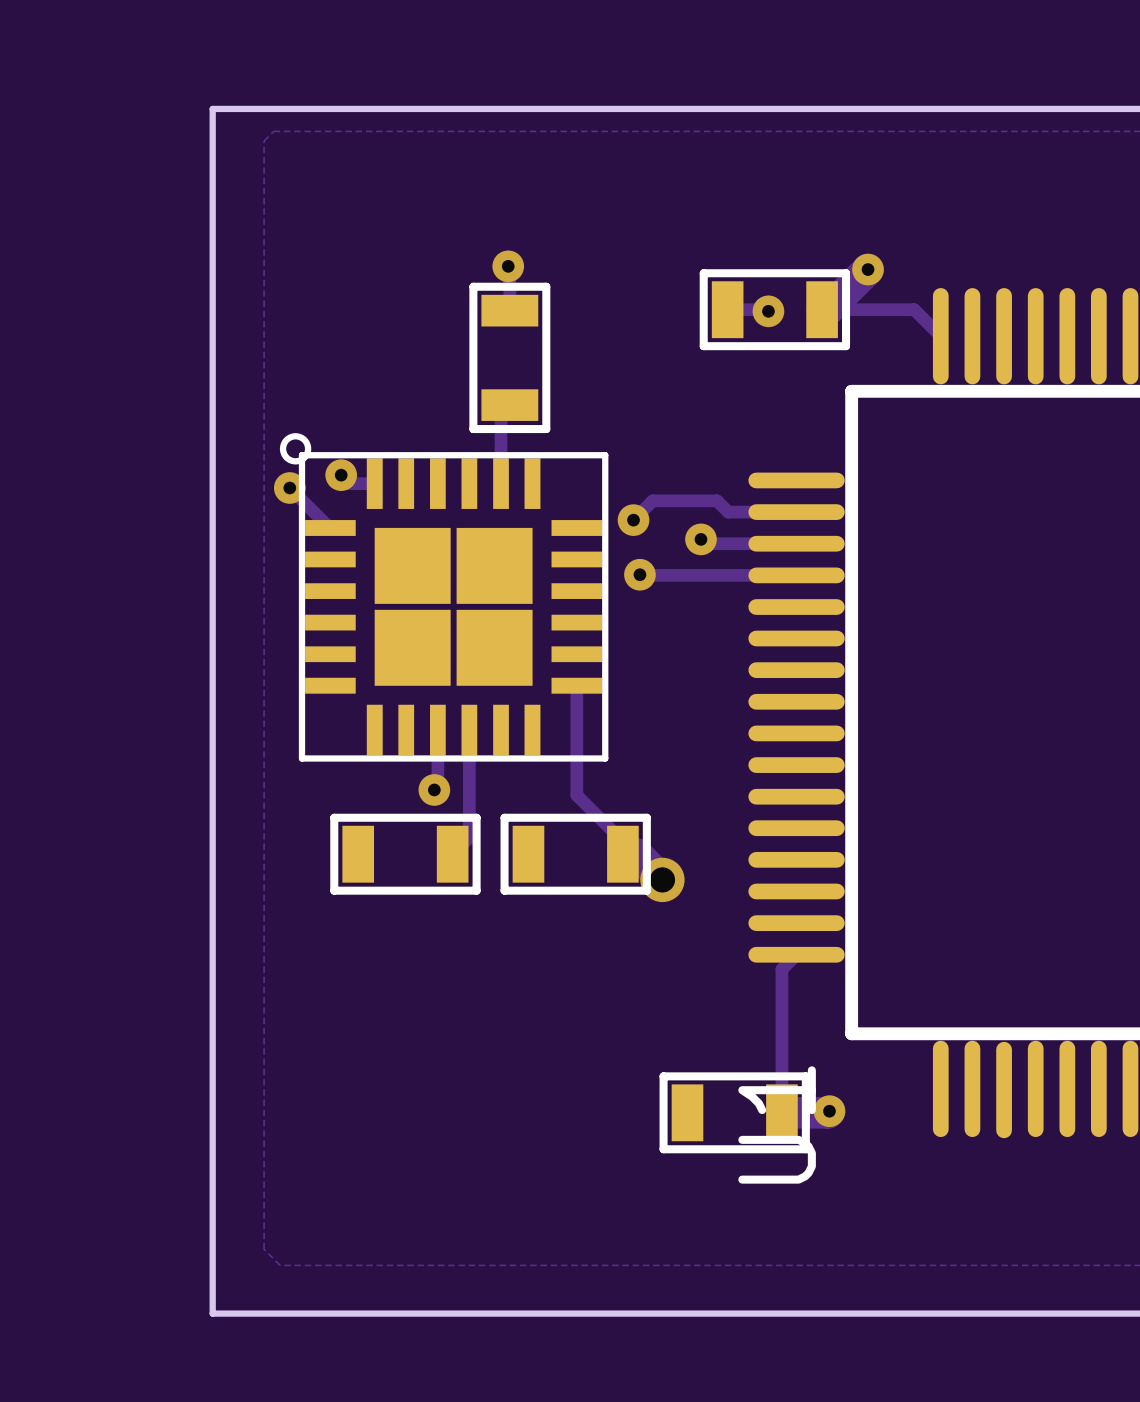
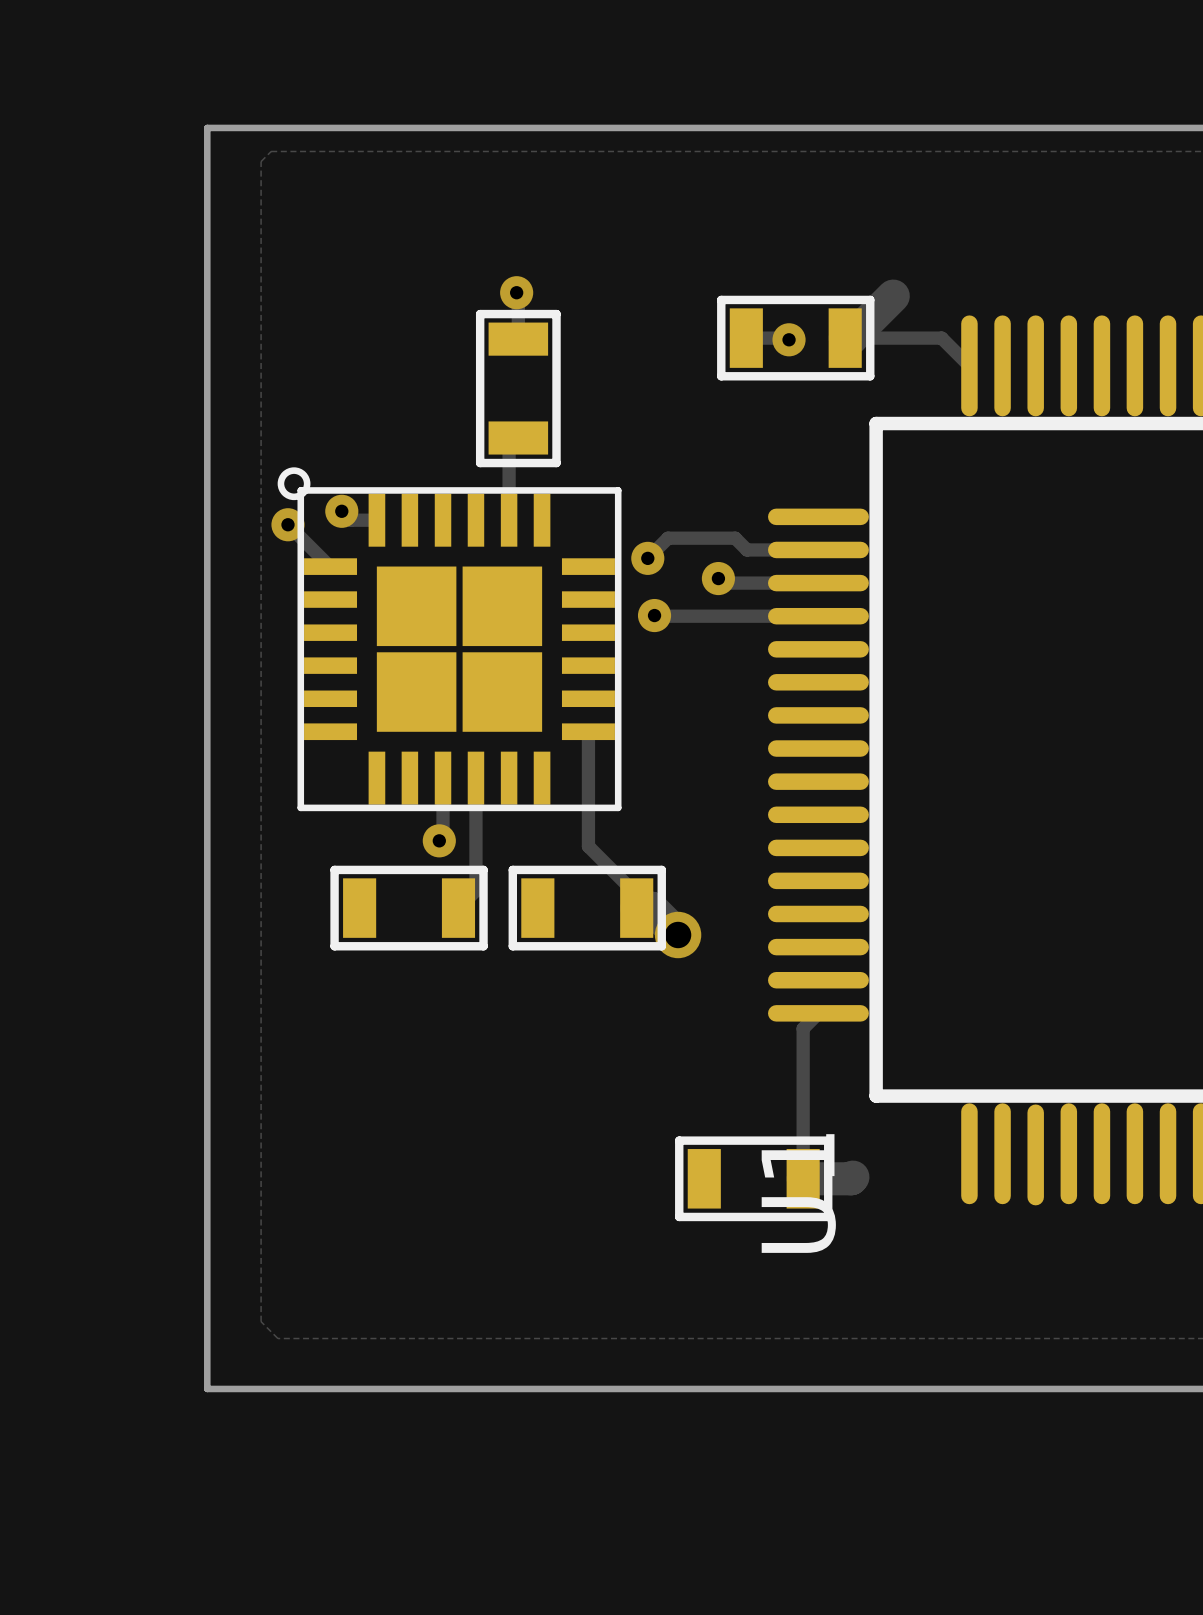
via: (868, 269) -> none
via: (829, 1111) -> none

